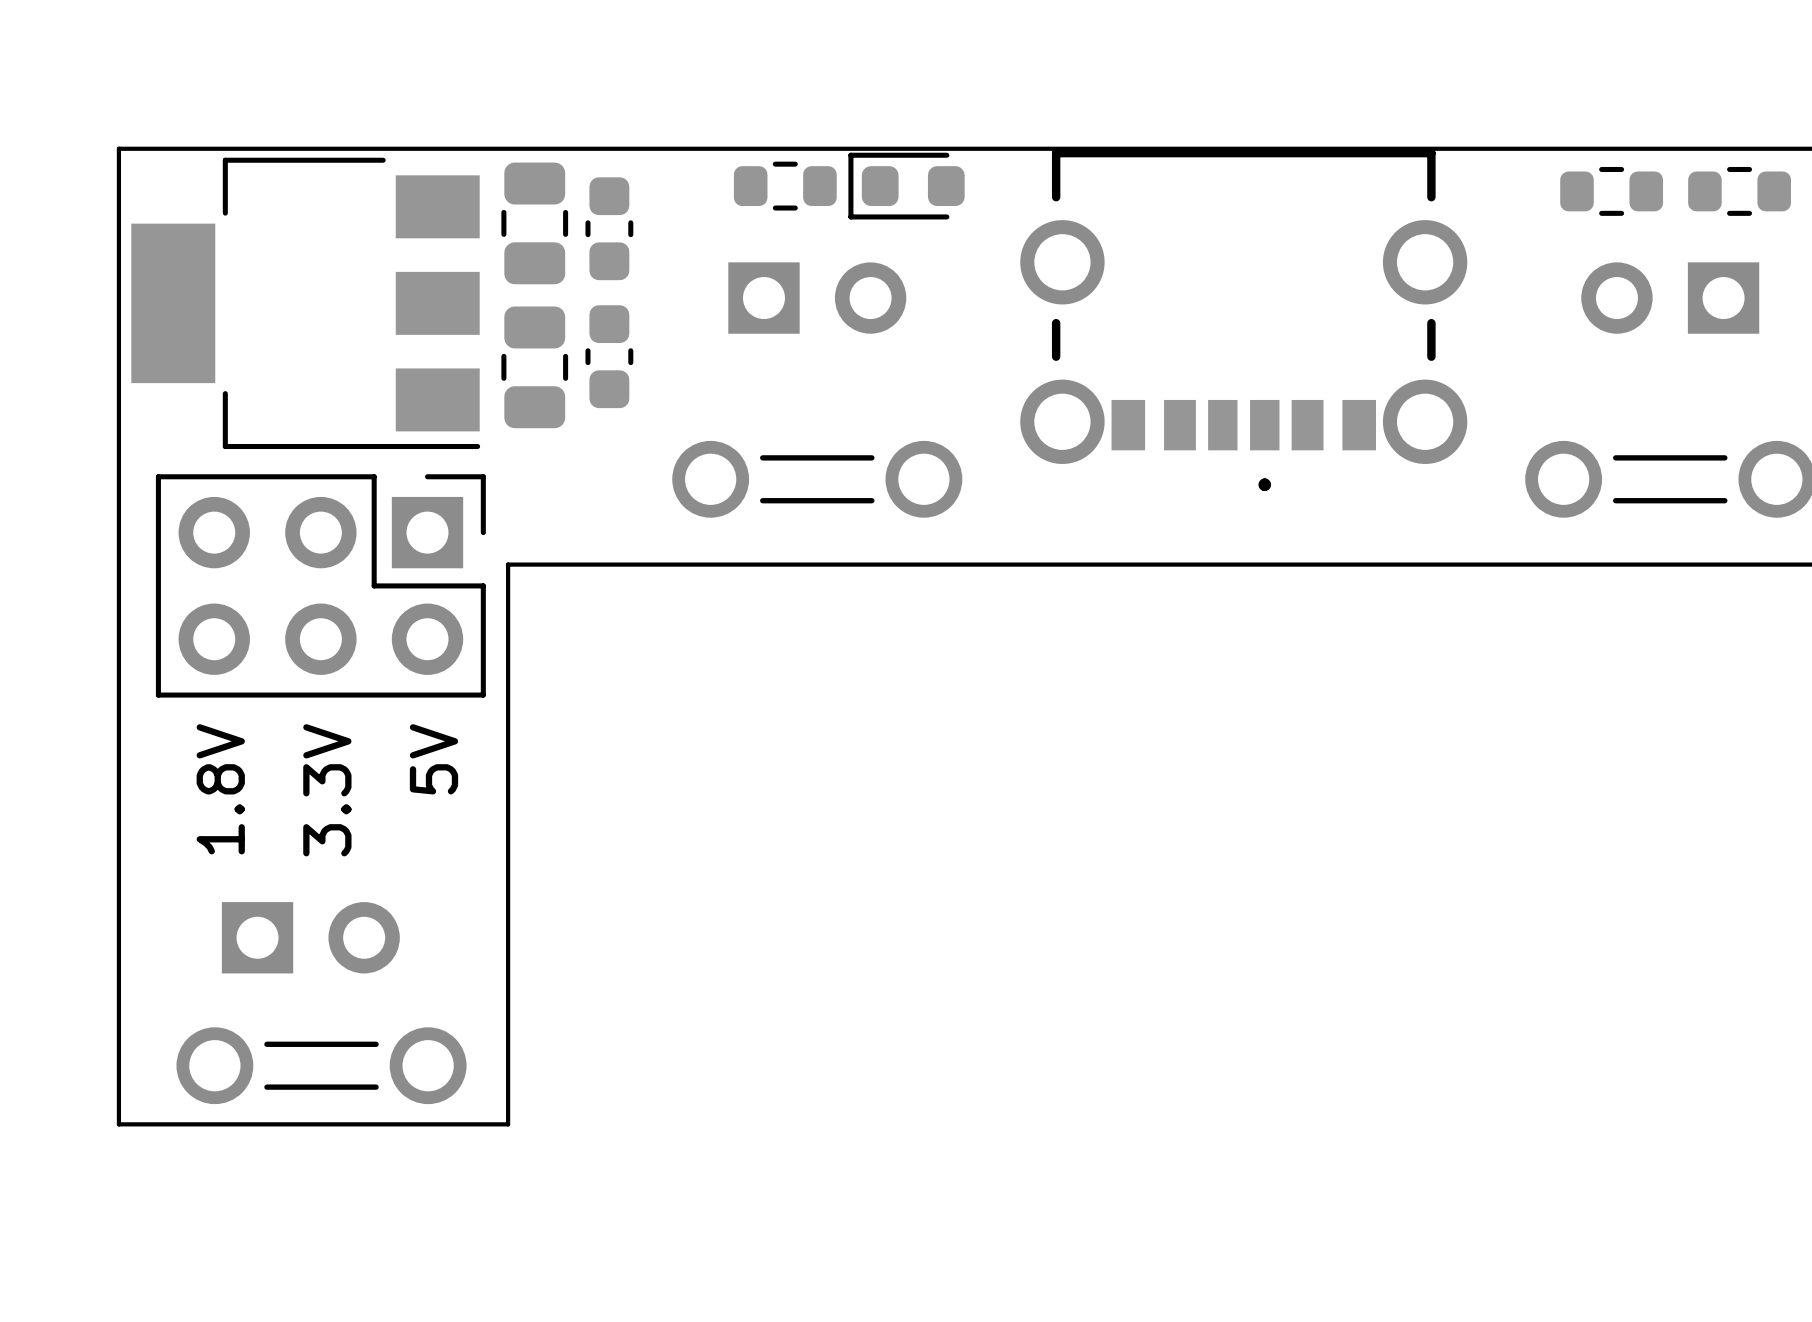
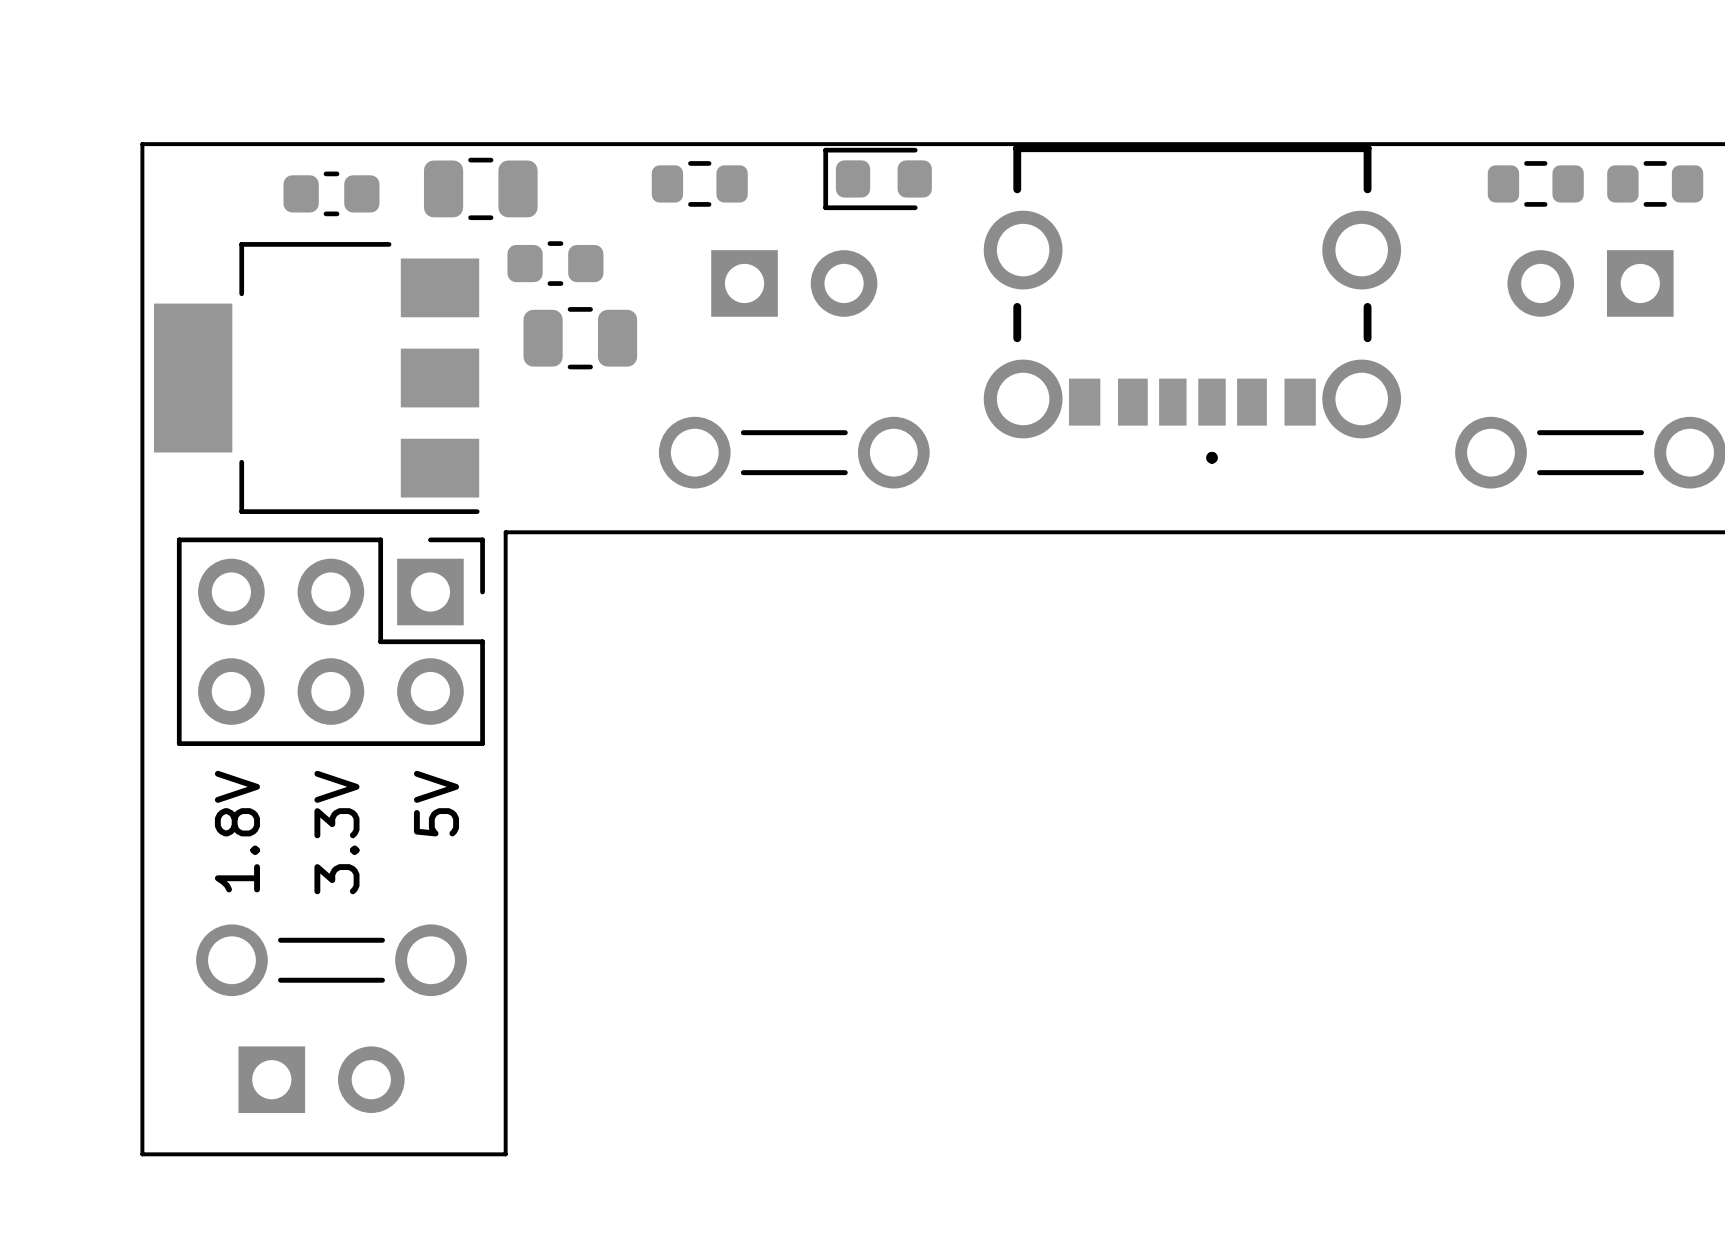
part position: (785, 186) -> (699, 183)
part: none -> (331, 193)
part rotation: 0° (534, 223) -> 90° clockwise (480, 188)
part rotation: 0° (609, 228) -> 90° clockwise (555, 263)
part position: (609, 228) -> (555, 263)
part position: (305, 303) -> (316, 378)
part footprint: [585, 305, 634, 409] -> [523, 307, 638, 370]
part: (534, 367) -> none
part position: (320, 585) -> (330, 641)
text position: 5V (433, 759) -> 5V (436, 803)
text position: 1.8V (220, 789) -> 1.8V (237, 831)
text position: 3.3V (327, 790) -> 3.3V (336, 832)
part position: (310, 937) -> (321, 1079)
part position: (321, 1065) -> (331, 960)
board edge: (118, 1124) (508, 1124) -> (142, 1054) (142, 1154) (505, 1154) (505, 1054)

